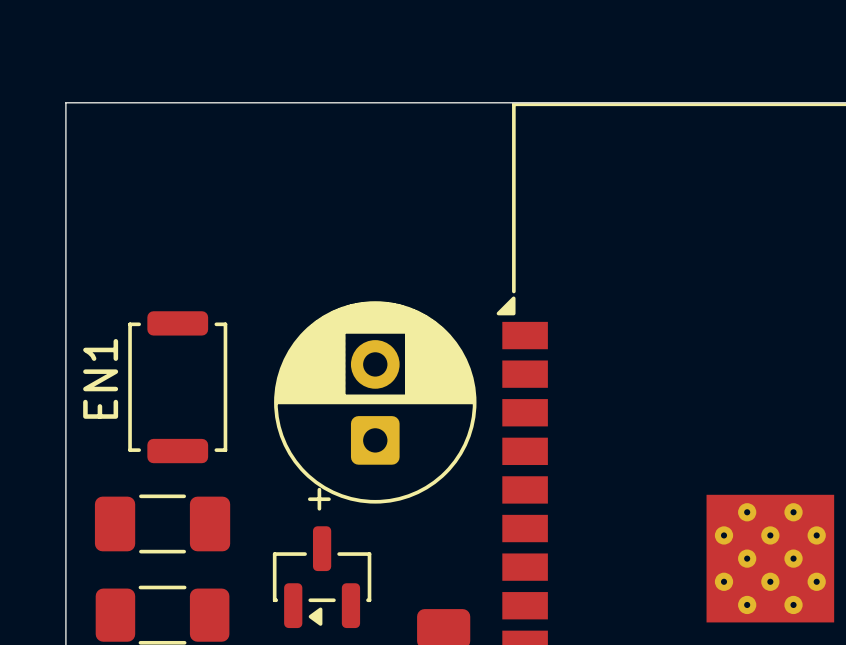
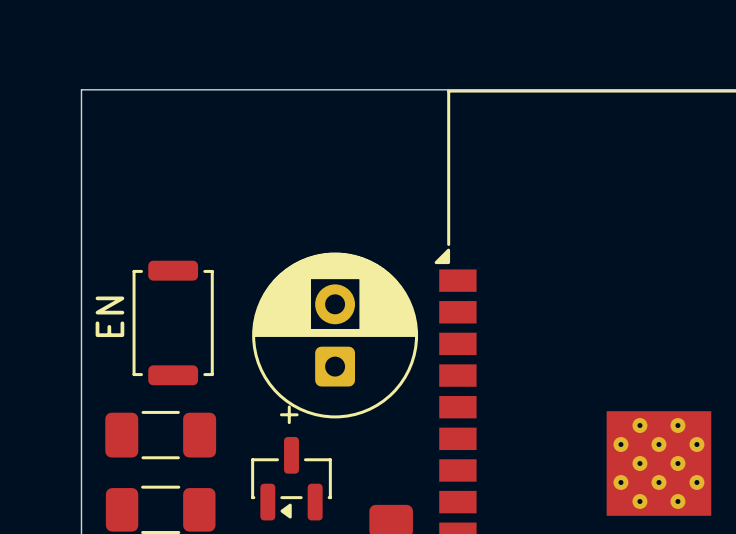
EN1 name: EN1 (100, 378) -> none
text: none -> EN (109, 316)

